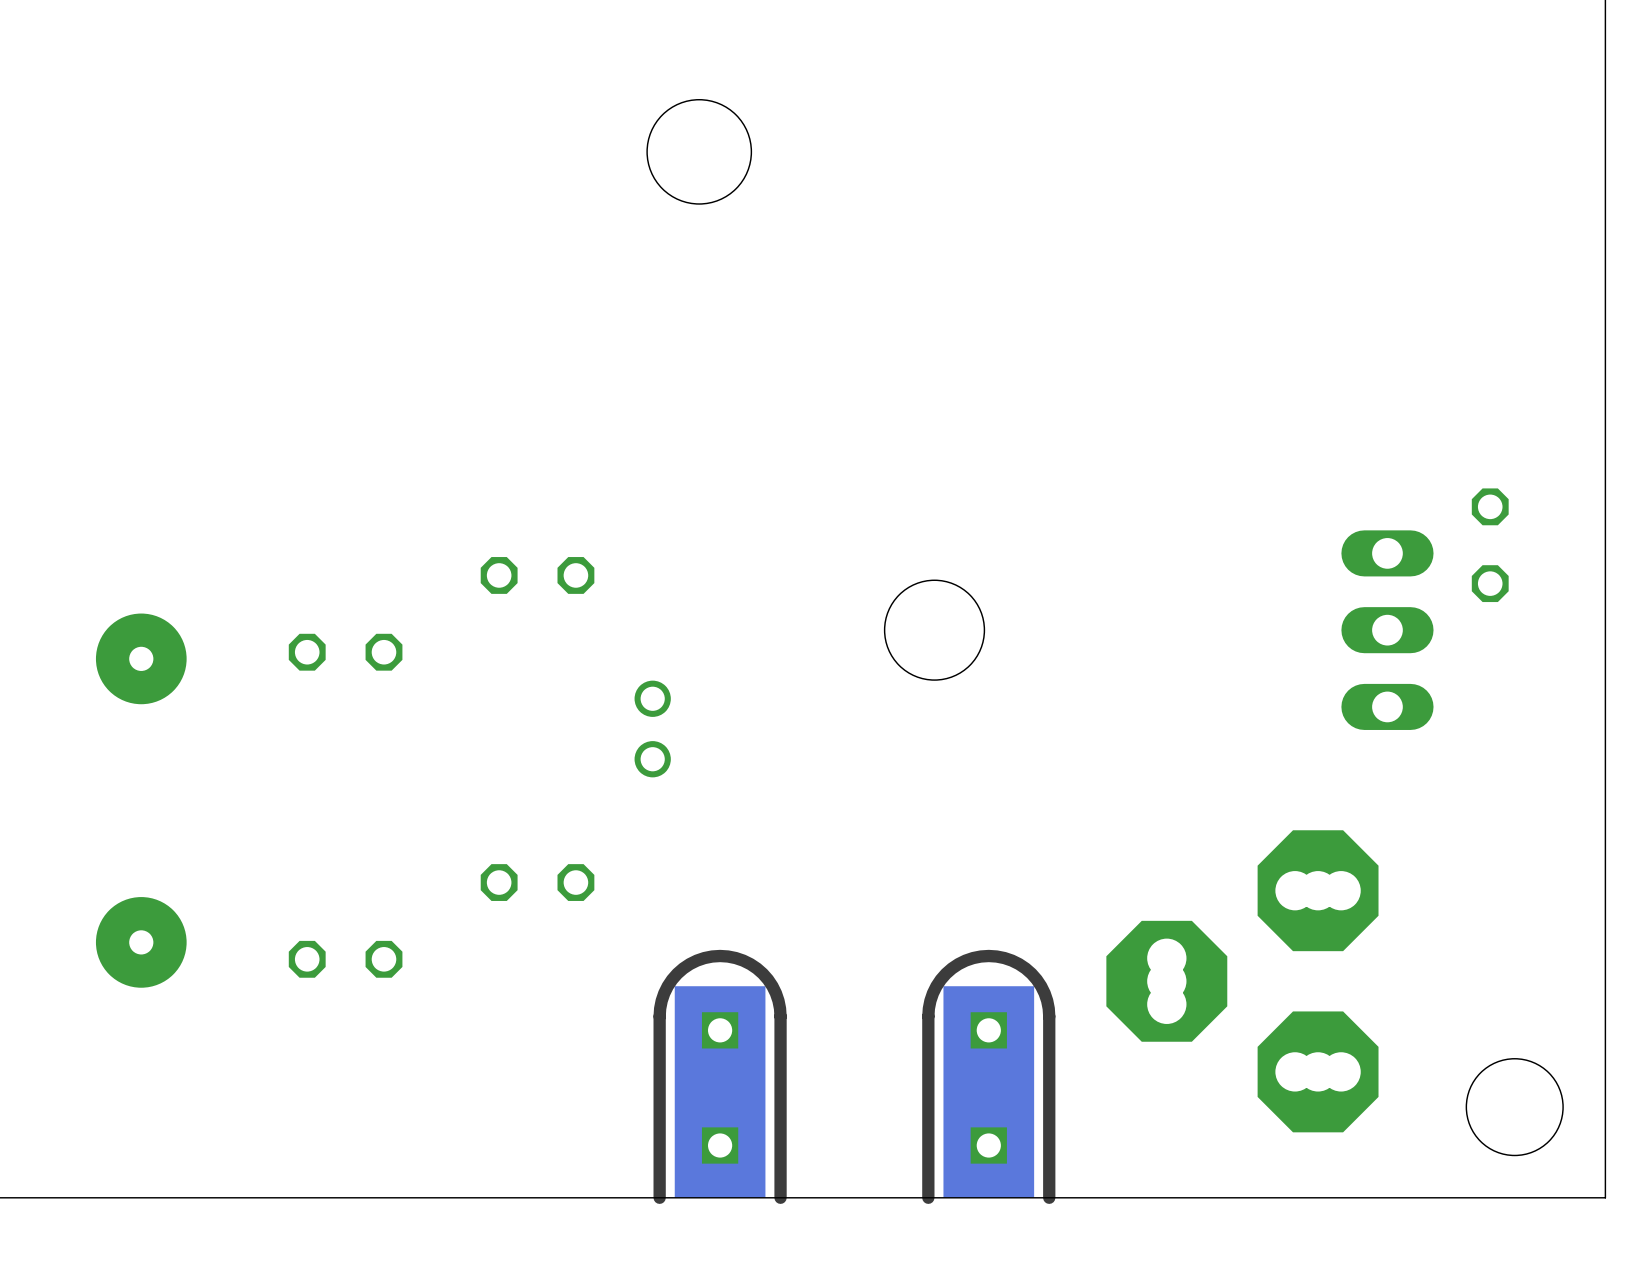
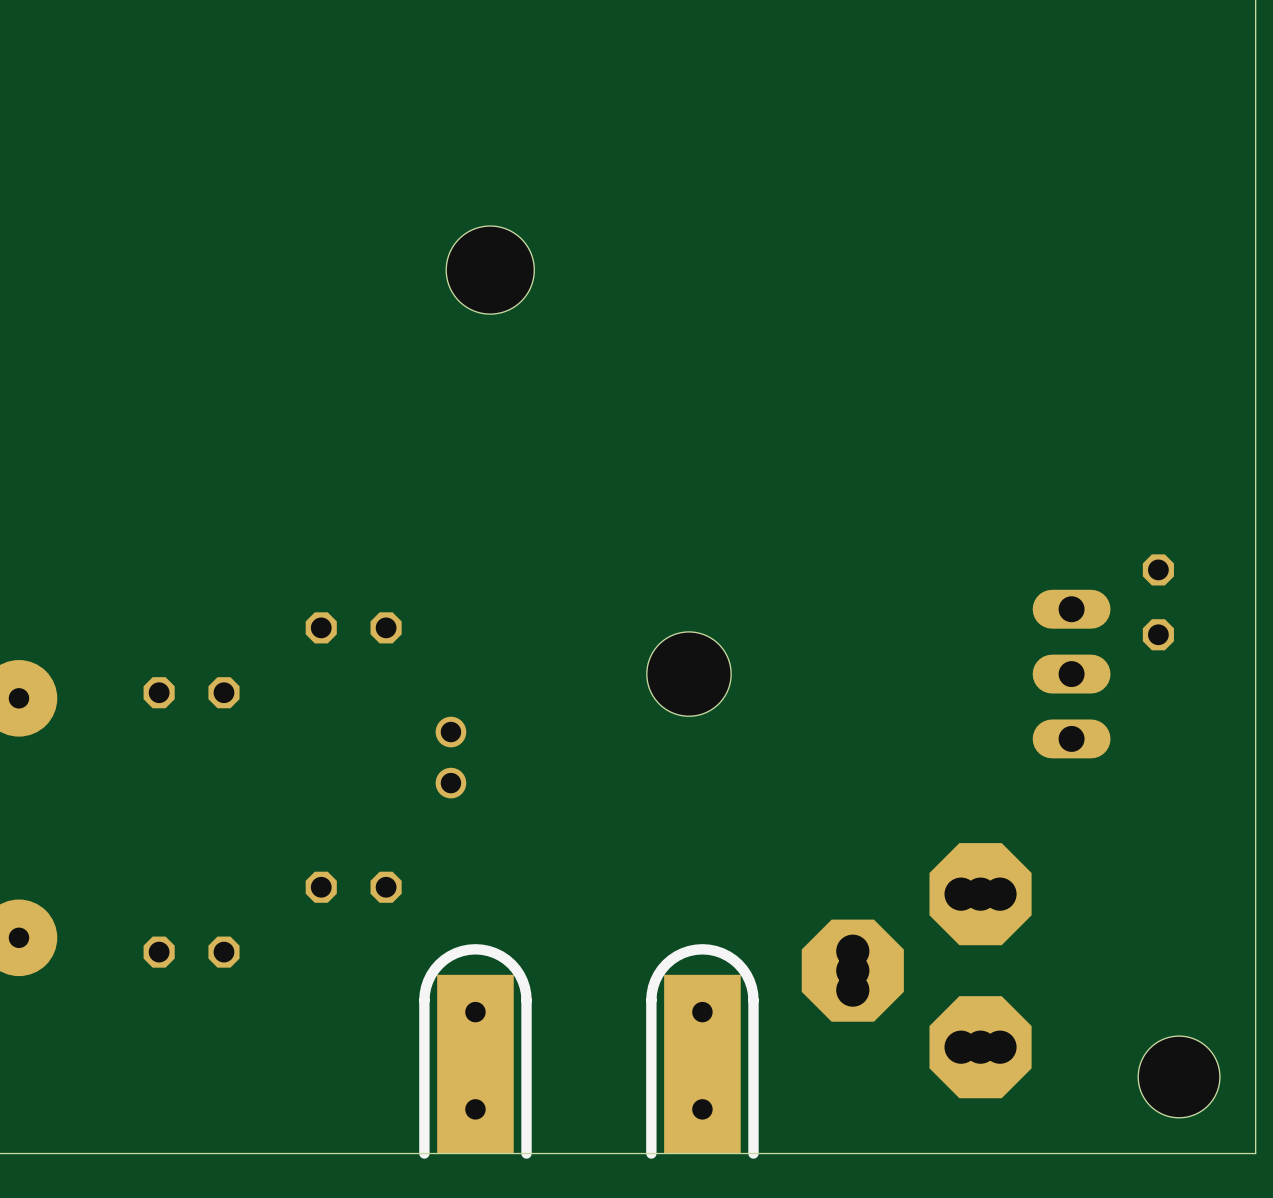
part position: (1242, 981) -> (916, 970)
part position: (720, 1076) -> (475, 1051)
part position: (988, 1076) -> (702, 1051)

